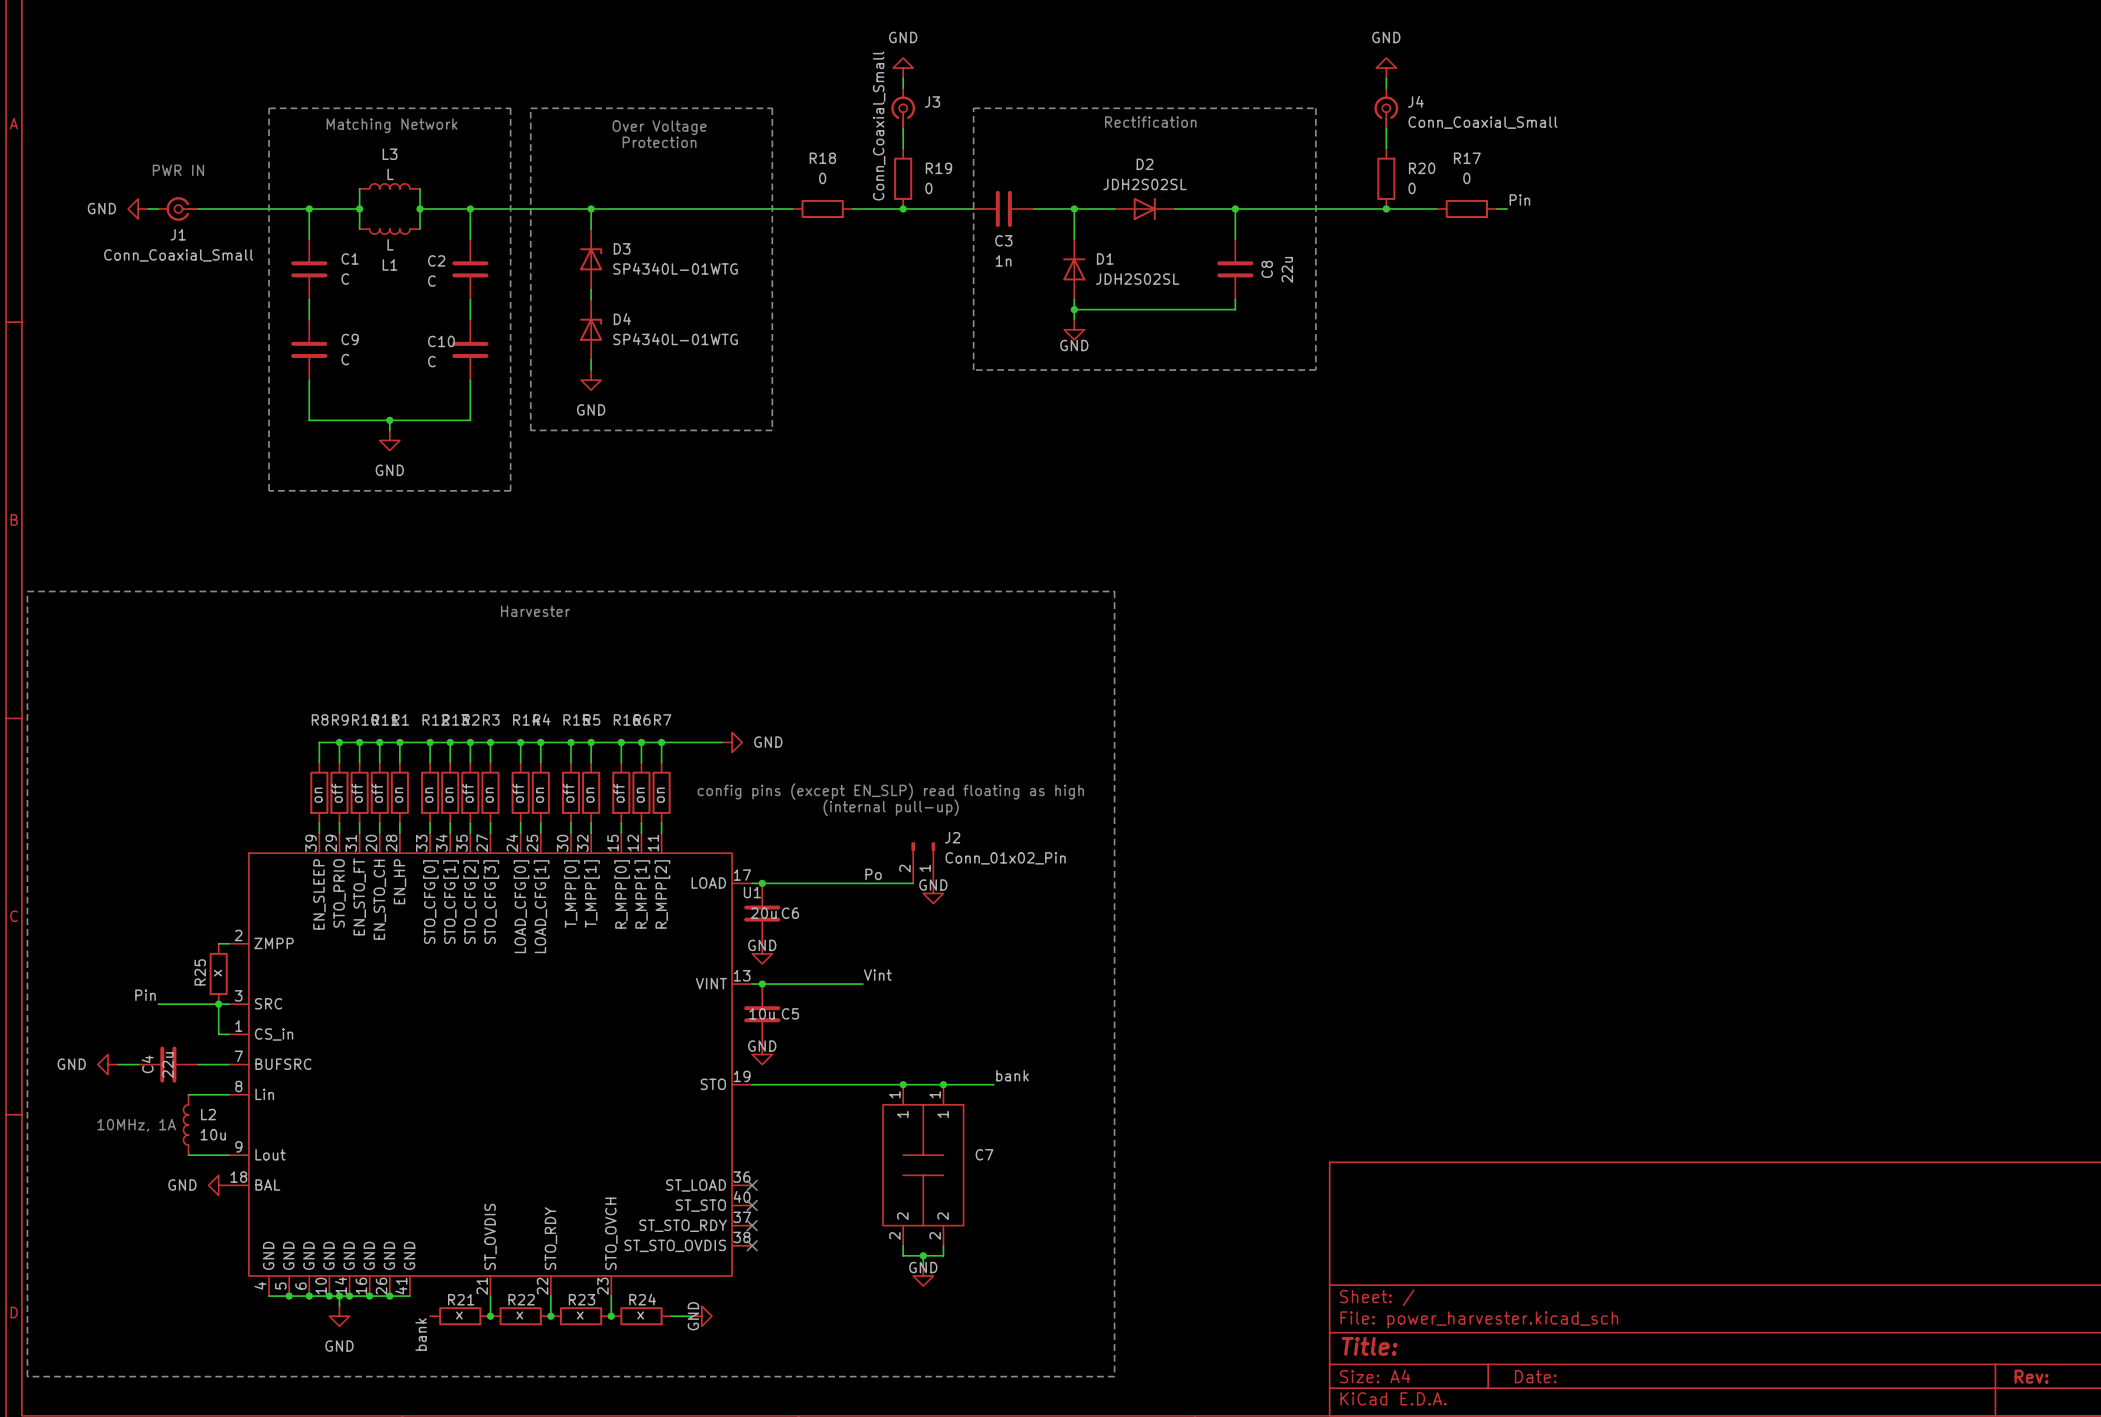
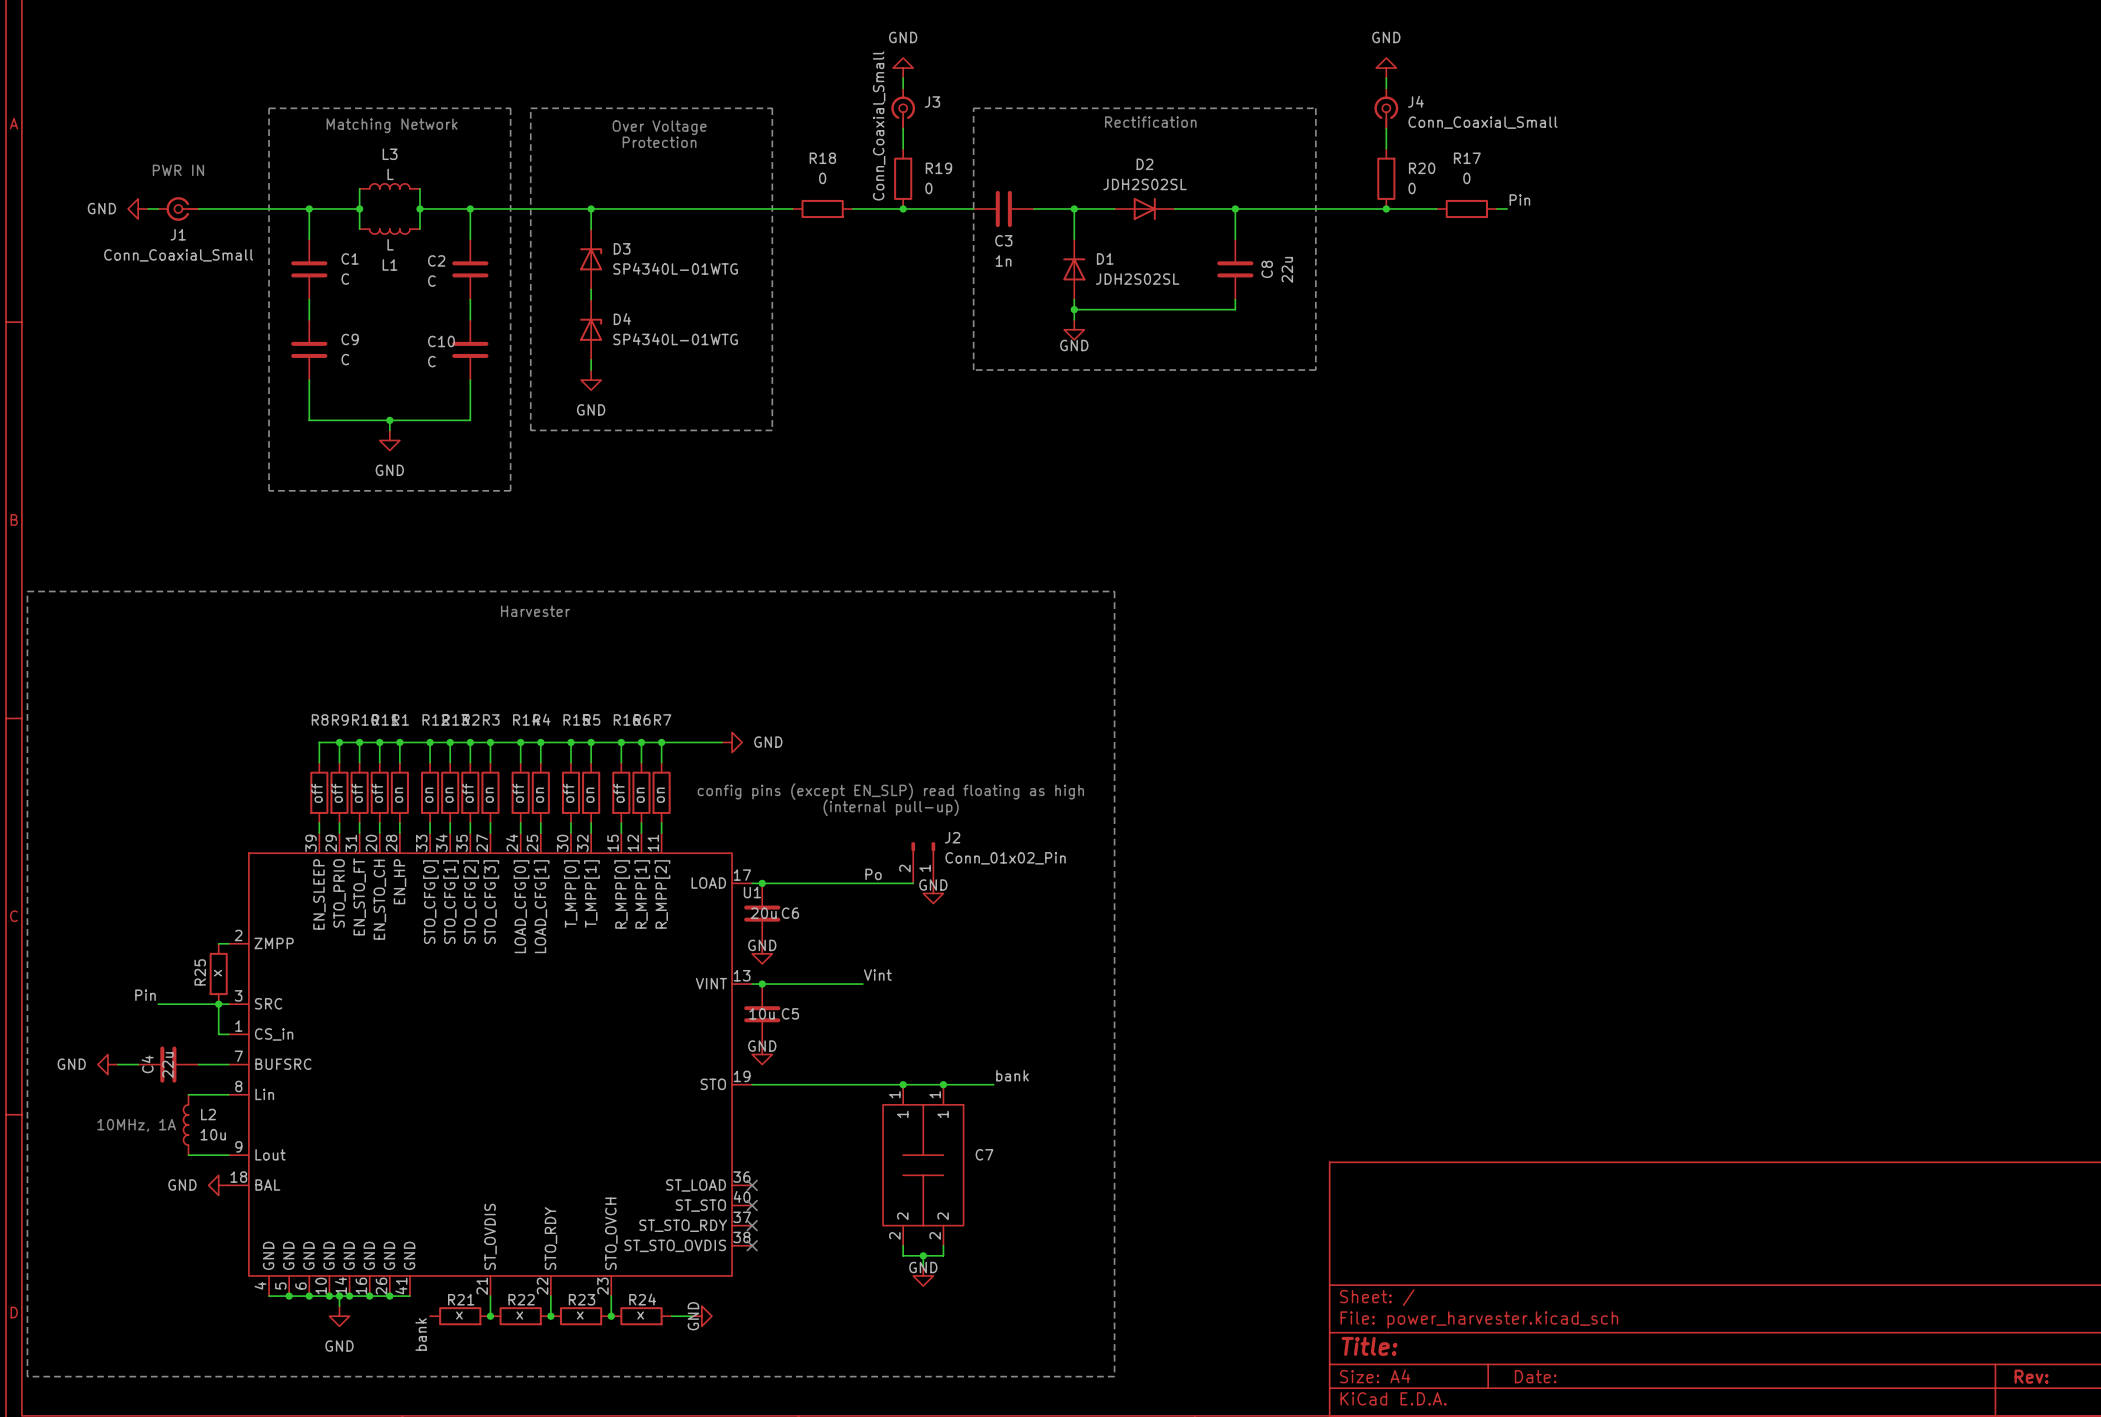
R8 value: on (318, 795) -> off (316, 793)

